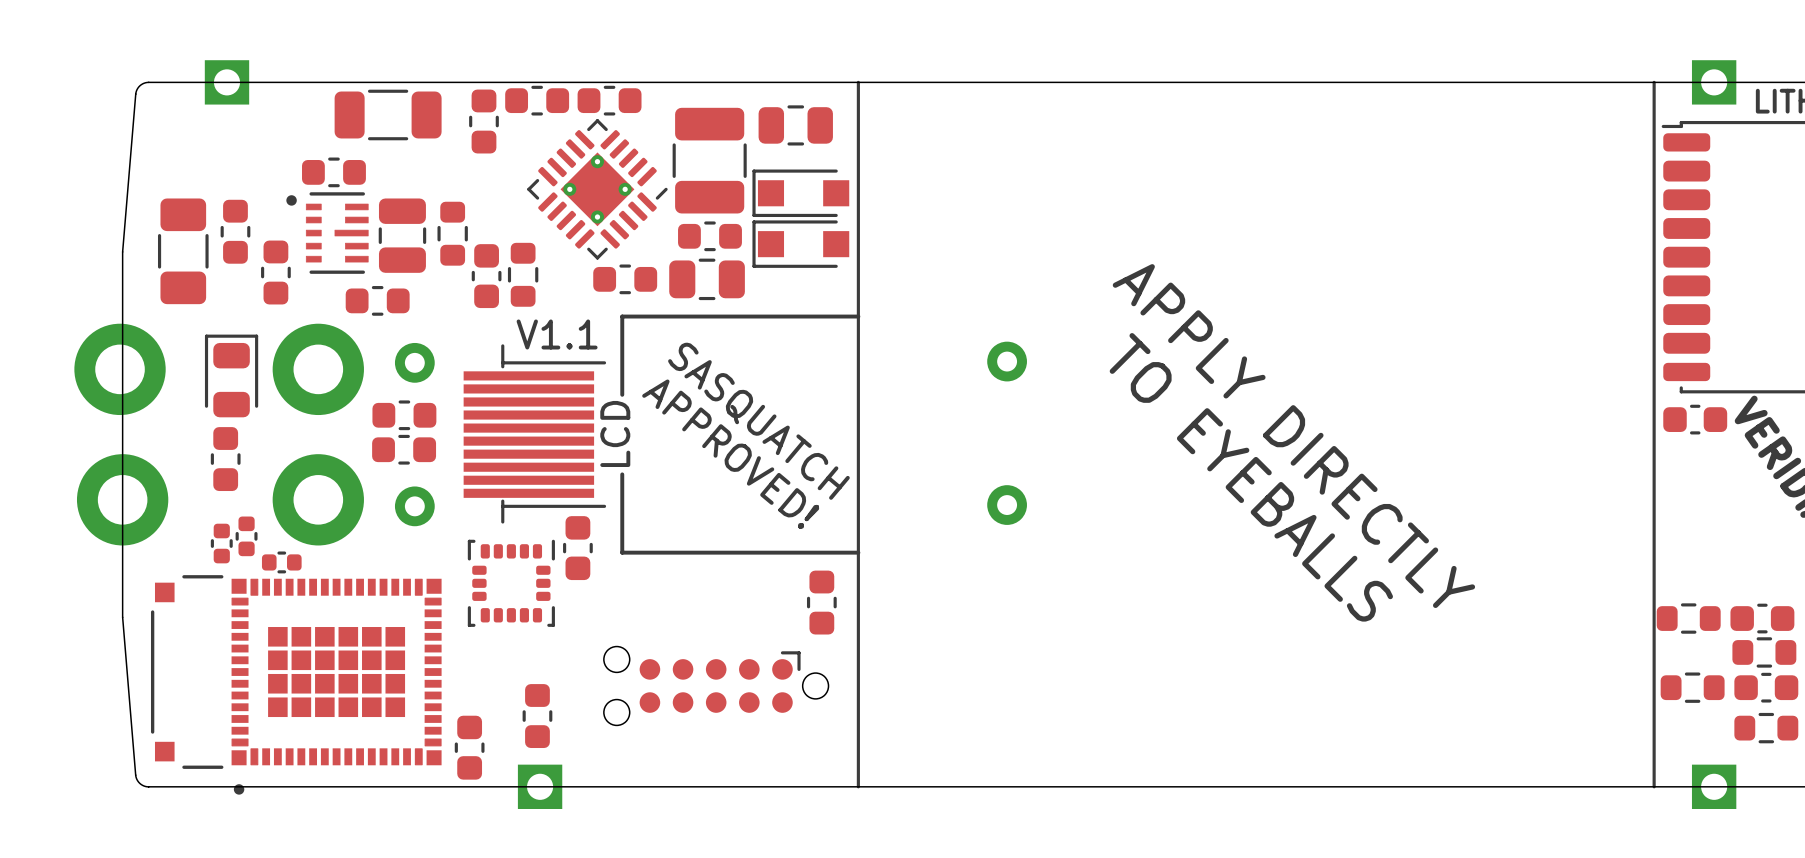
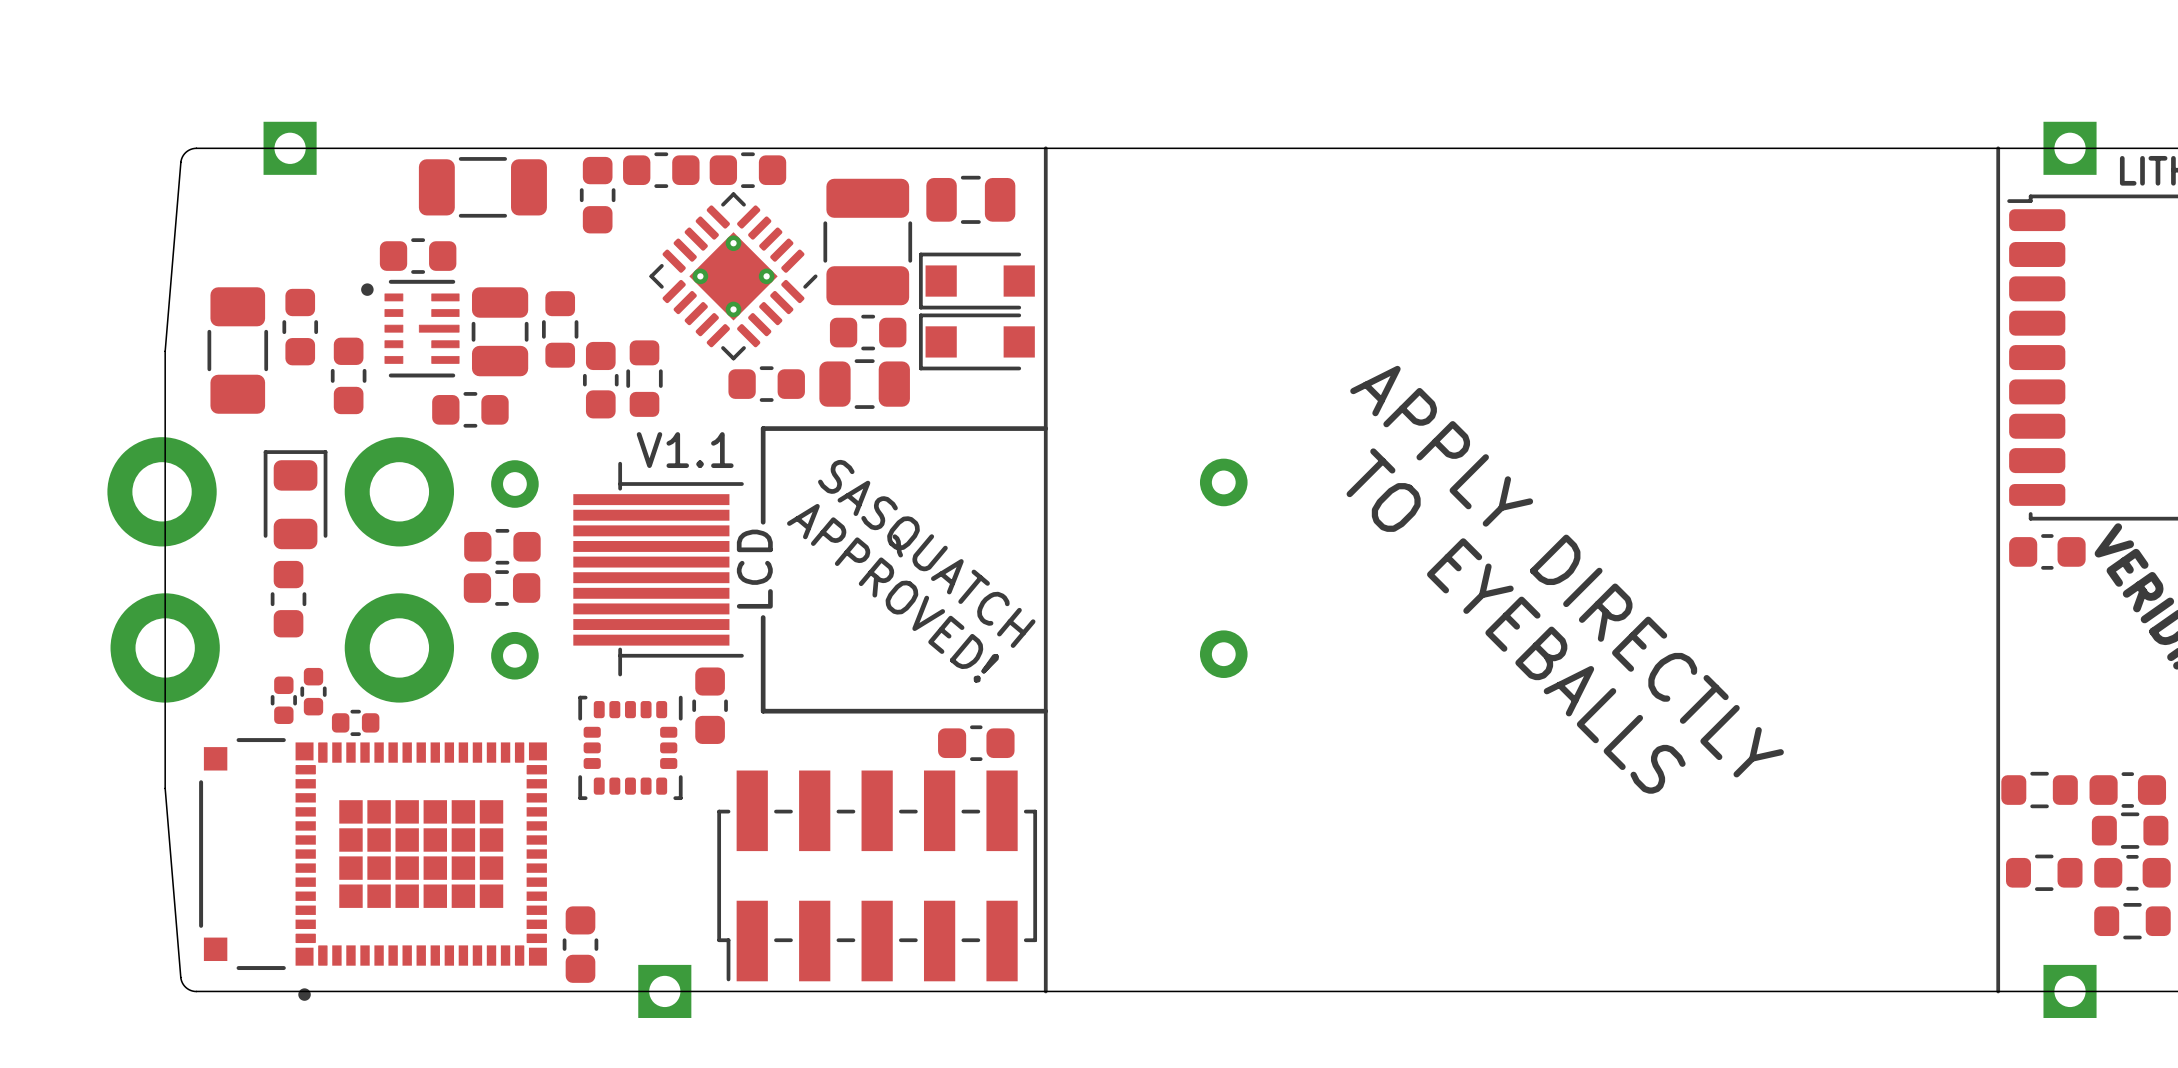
part: none -> (976, 743)
part: (821, 602) -> none
part footprint: [603, 646, 829, 726] -> [717, 770, 1038, 982]
part: (537, 716) -> none

